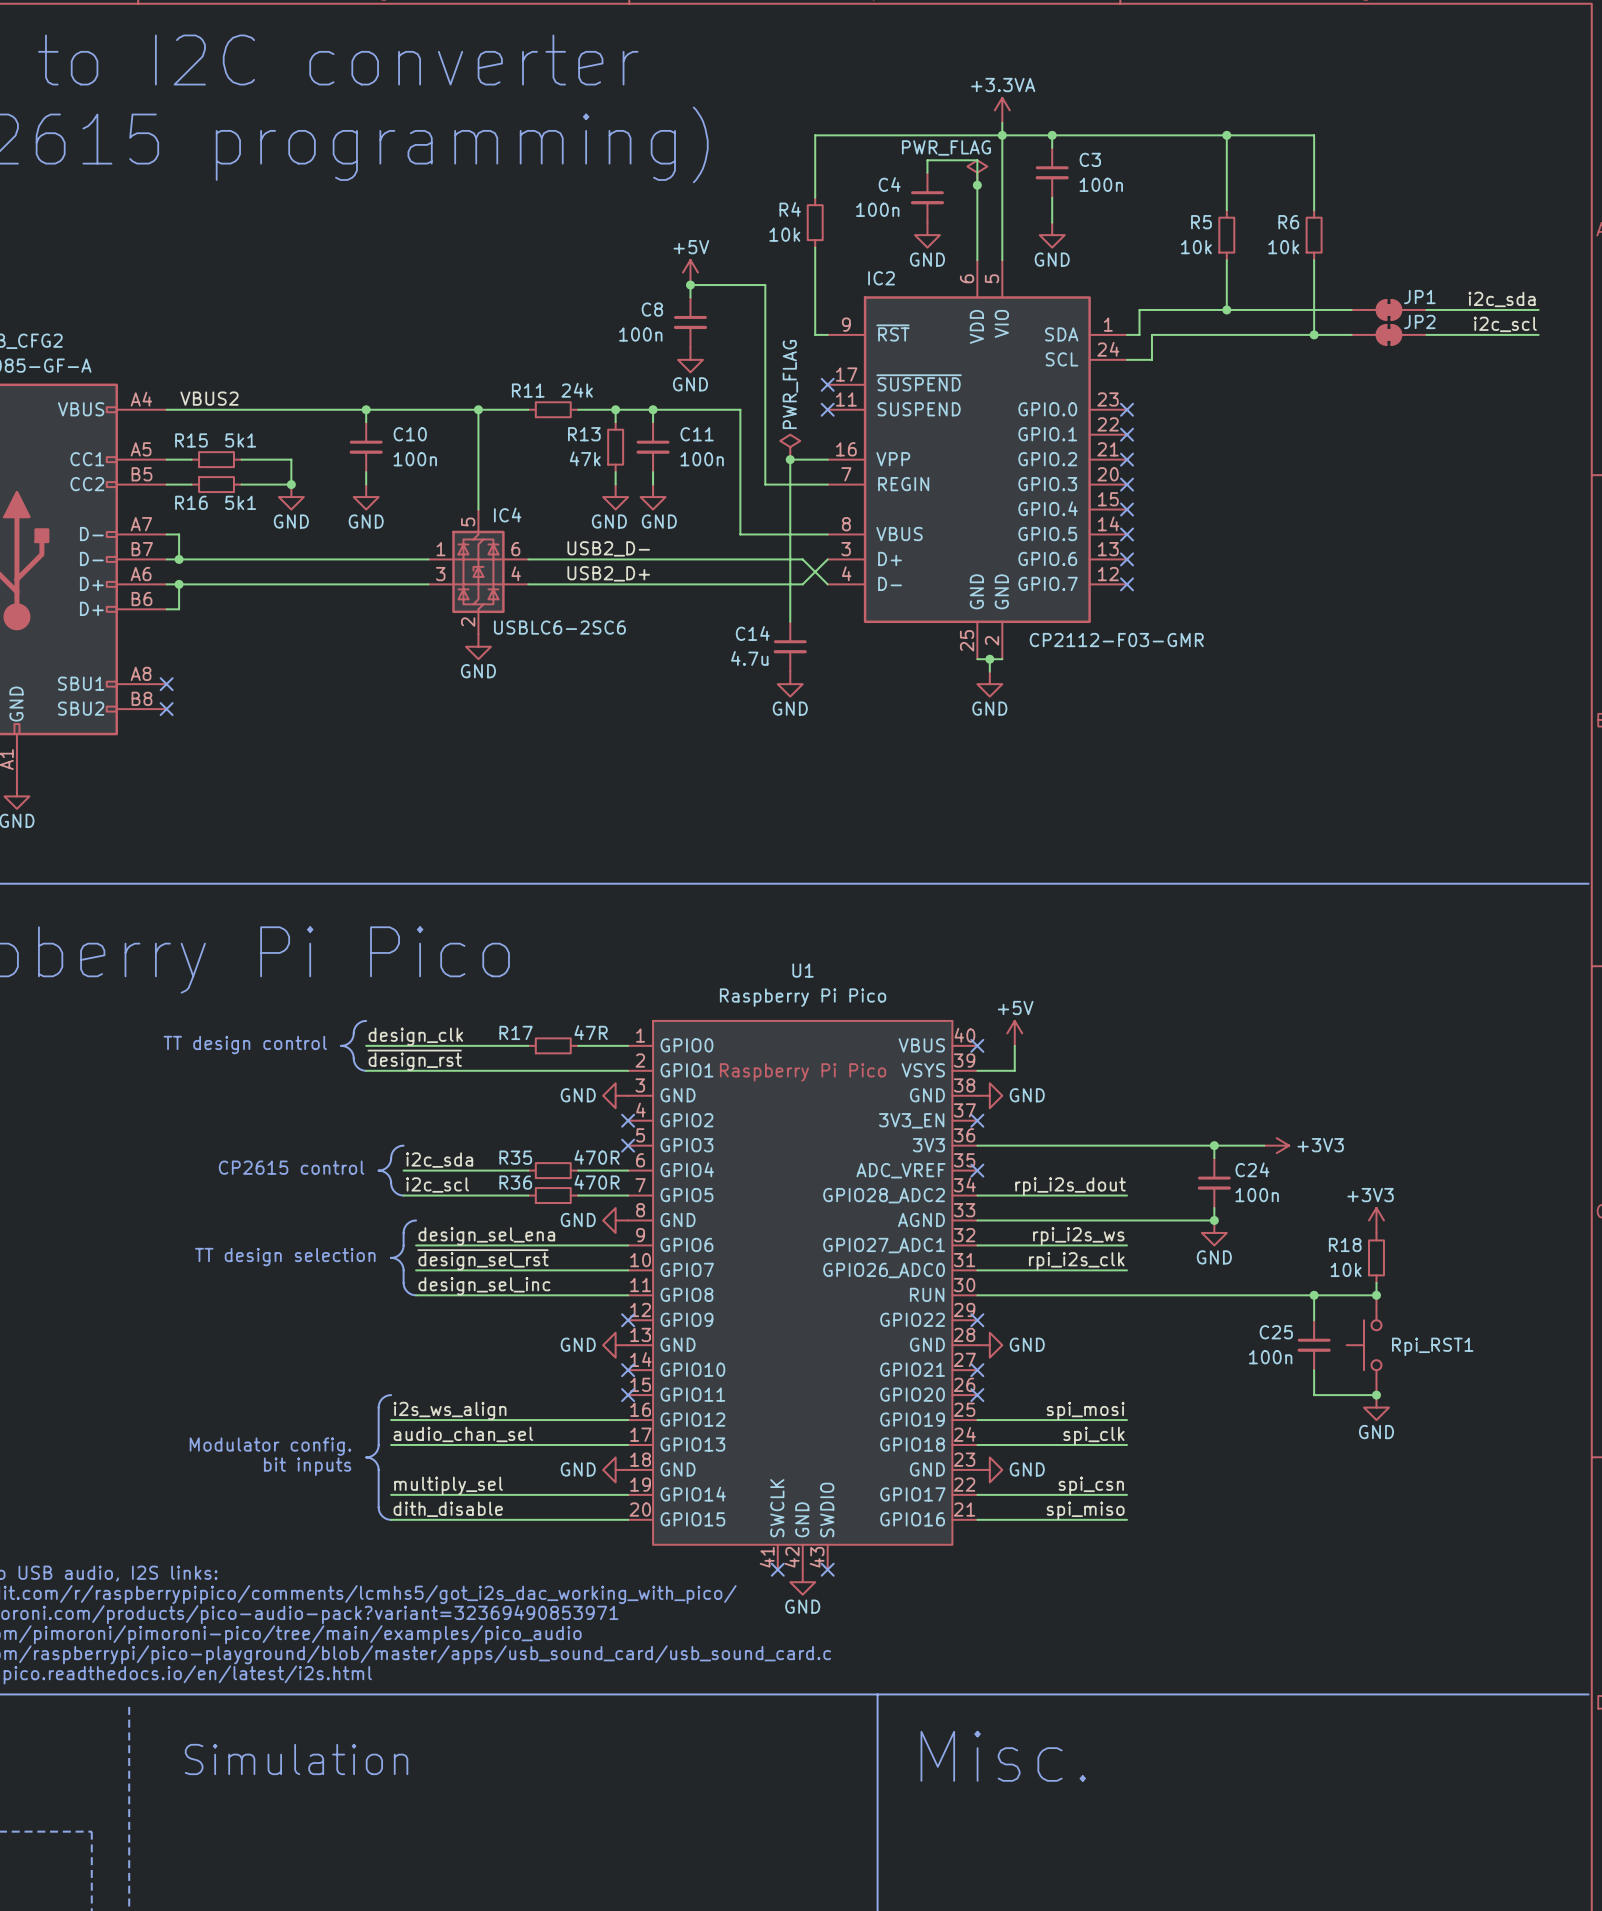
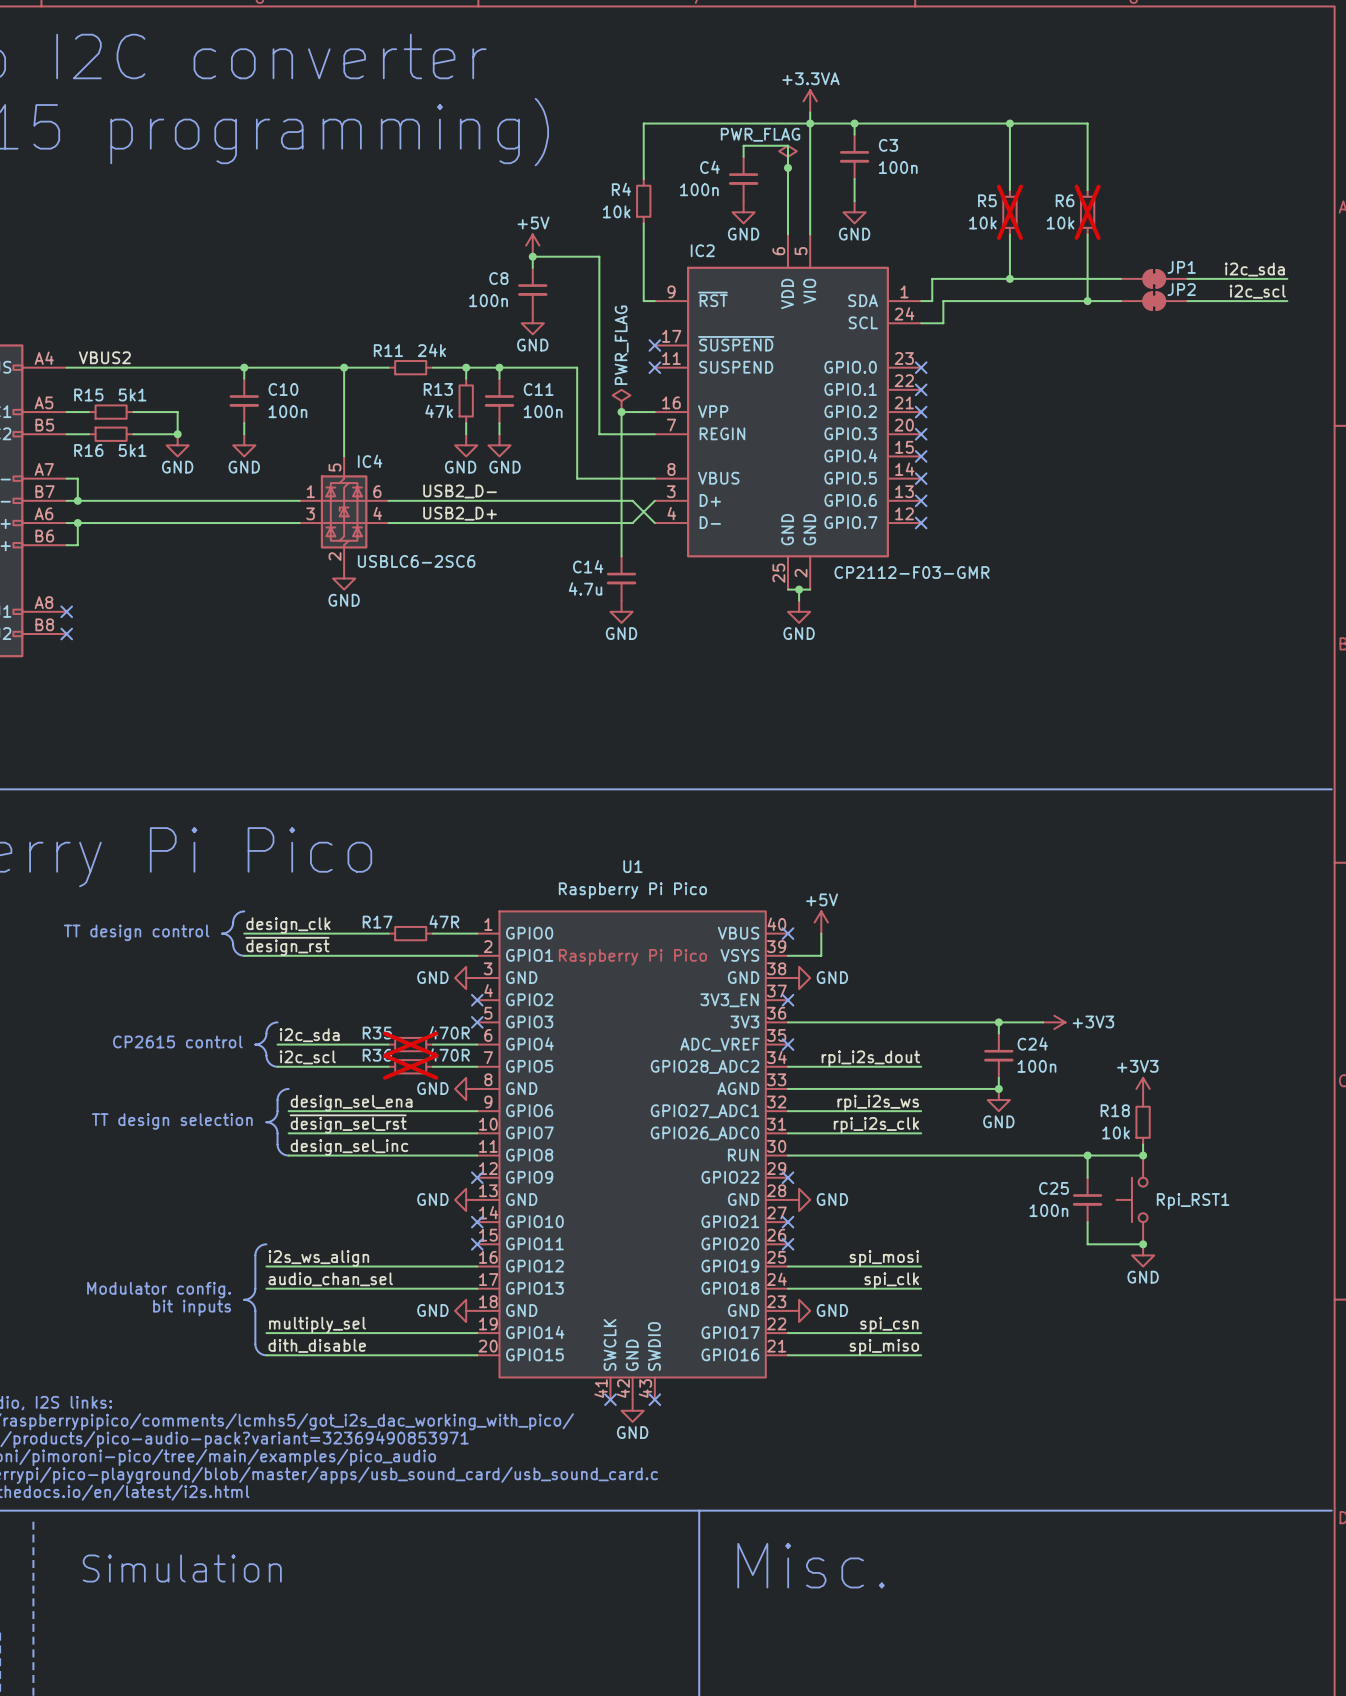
R5 do-not-place cross: none -> (1009, 212)
R6 do-not-place cross: none -> (1087, 212)
R35 do-not-place cross: none -> (410, 1044)
R36 do-not-place cross: none -> (410, 1066)

